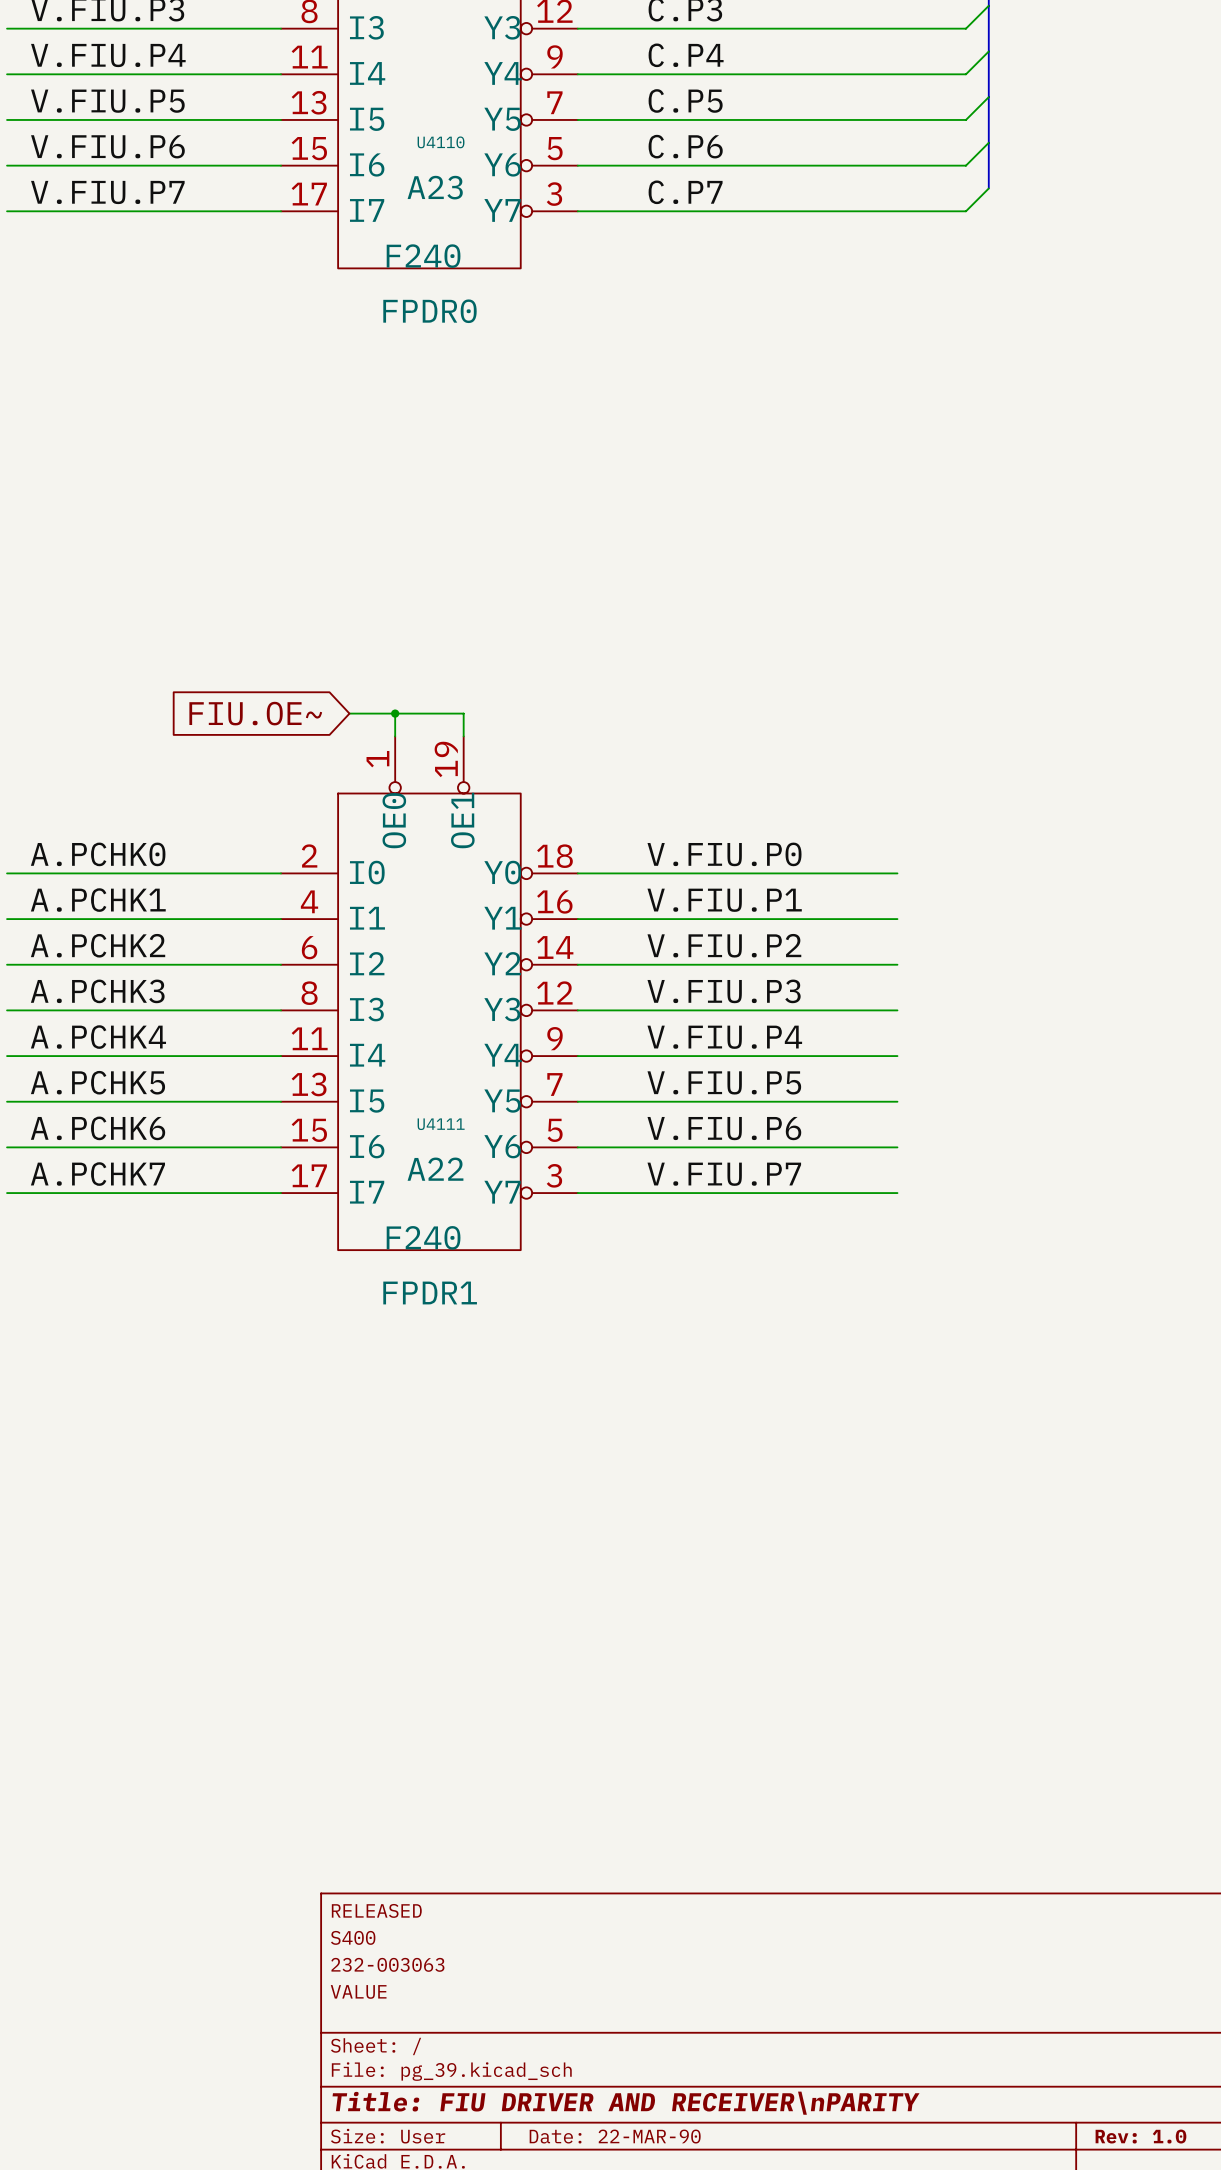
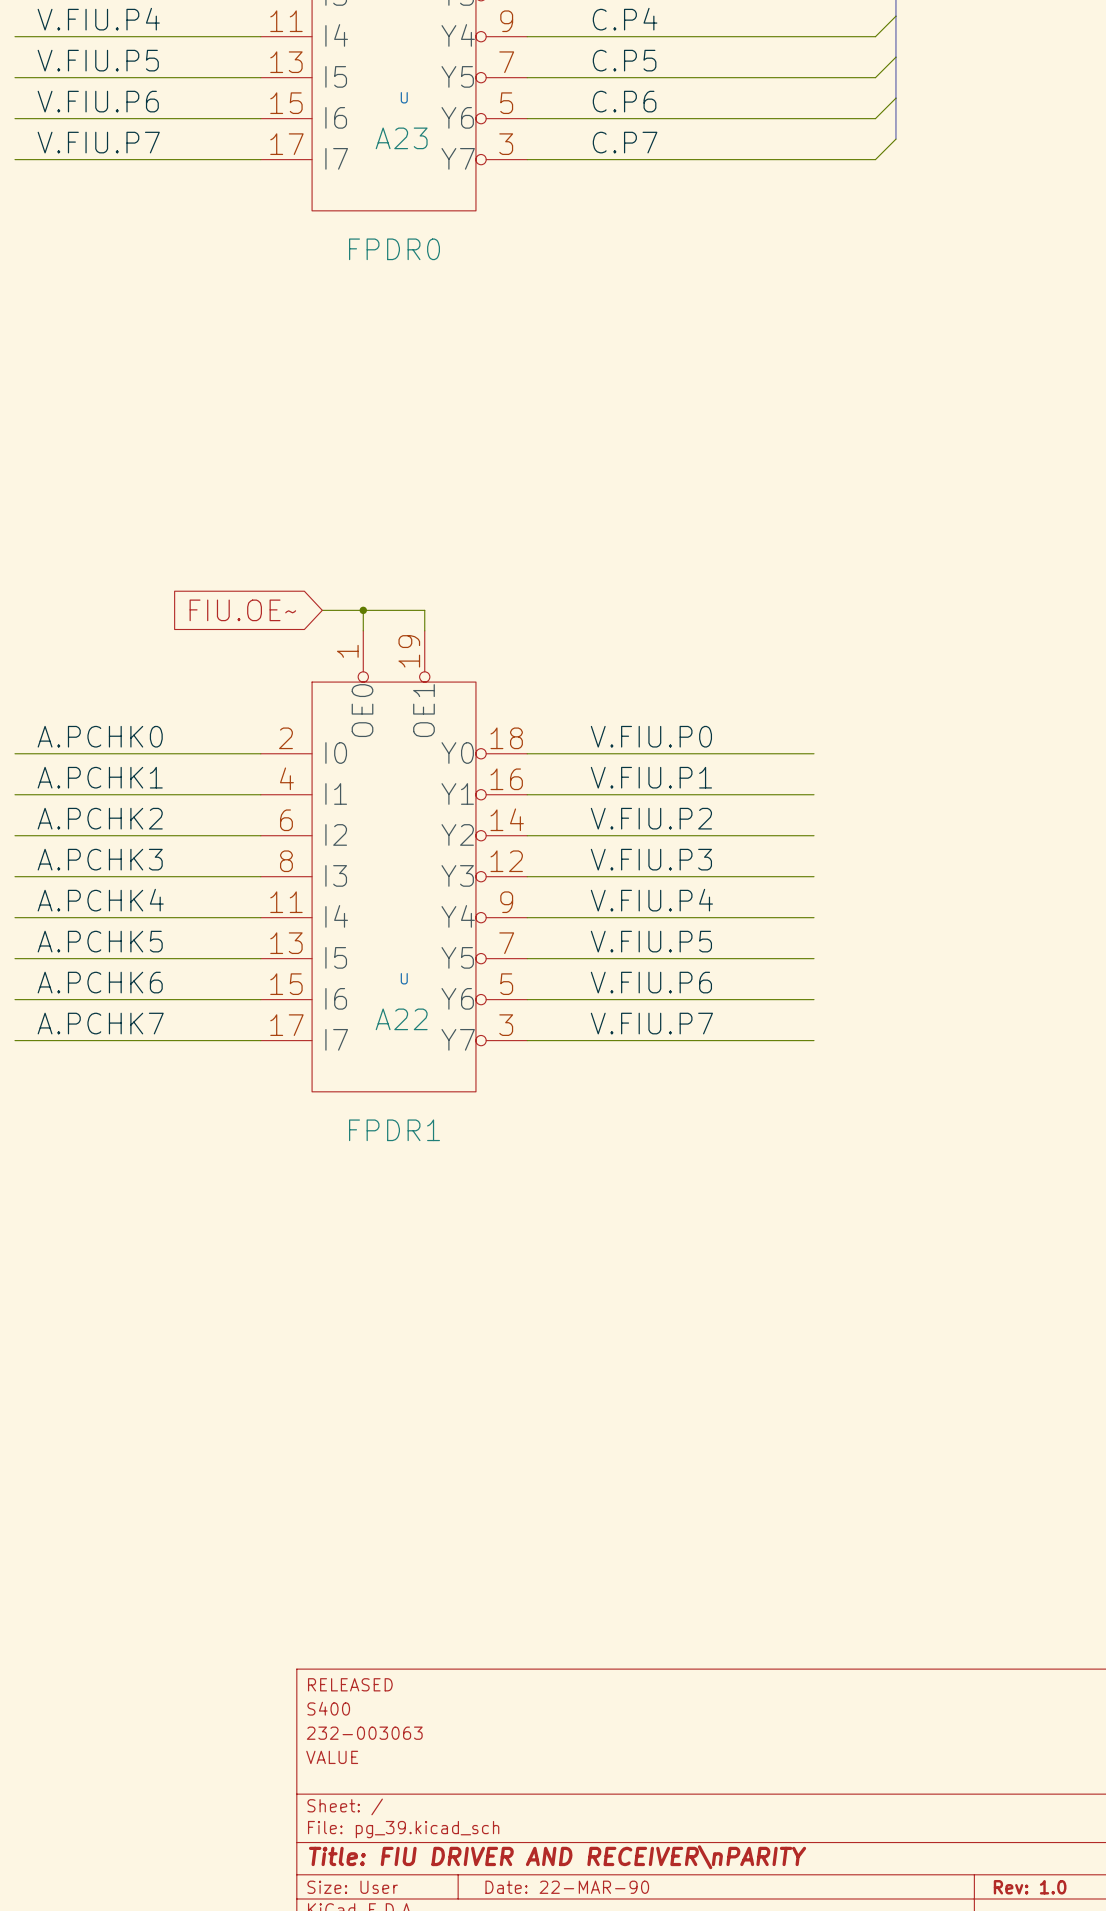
U4110 name: U4110 (441, 142) -> U (404, 97)
U4110 value: F240 (423, 256) -> none
U4111 name: U4111 (441, 1124) -> U (404, 978)
U4111 value: F240 (423, 1237) -> none

